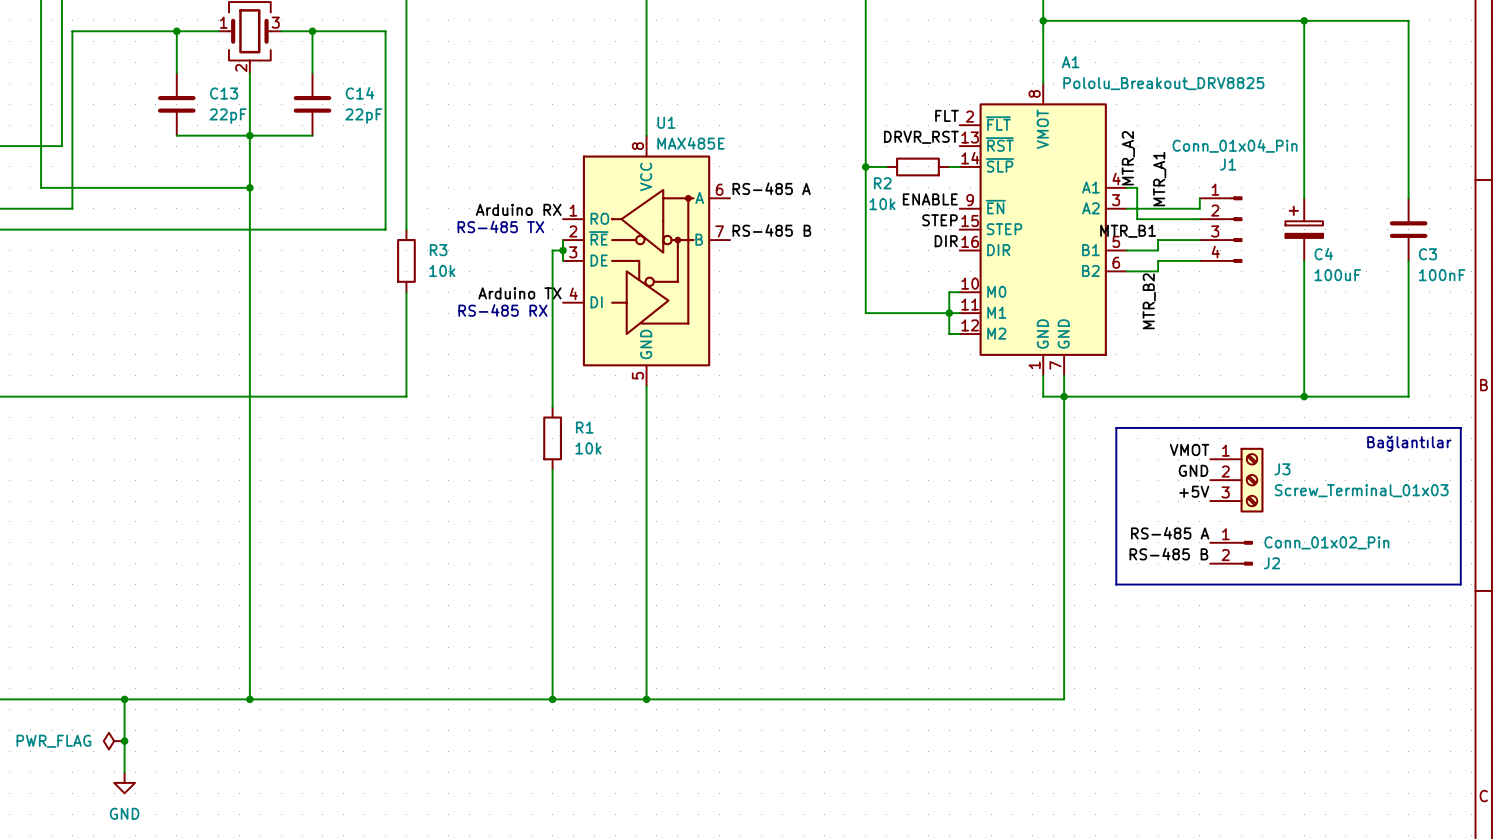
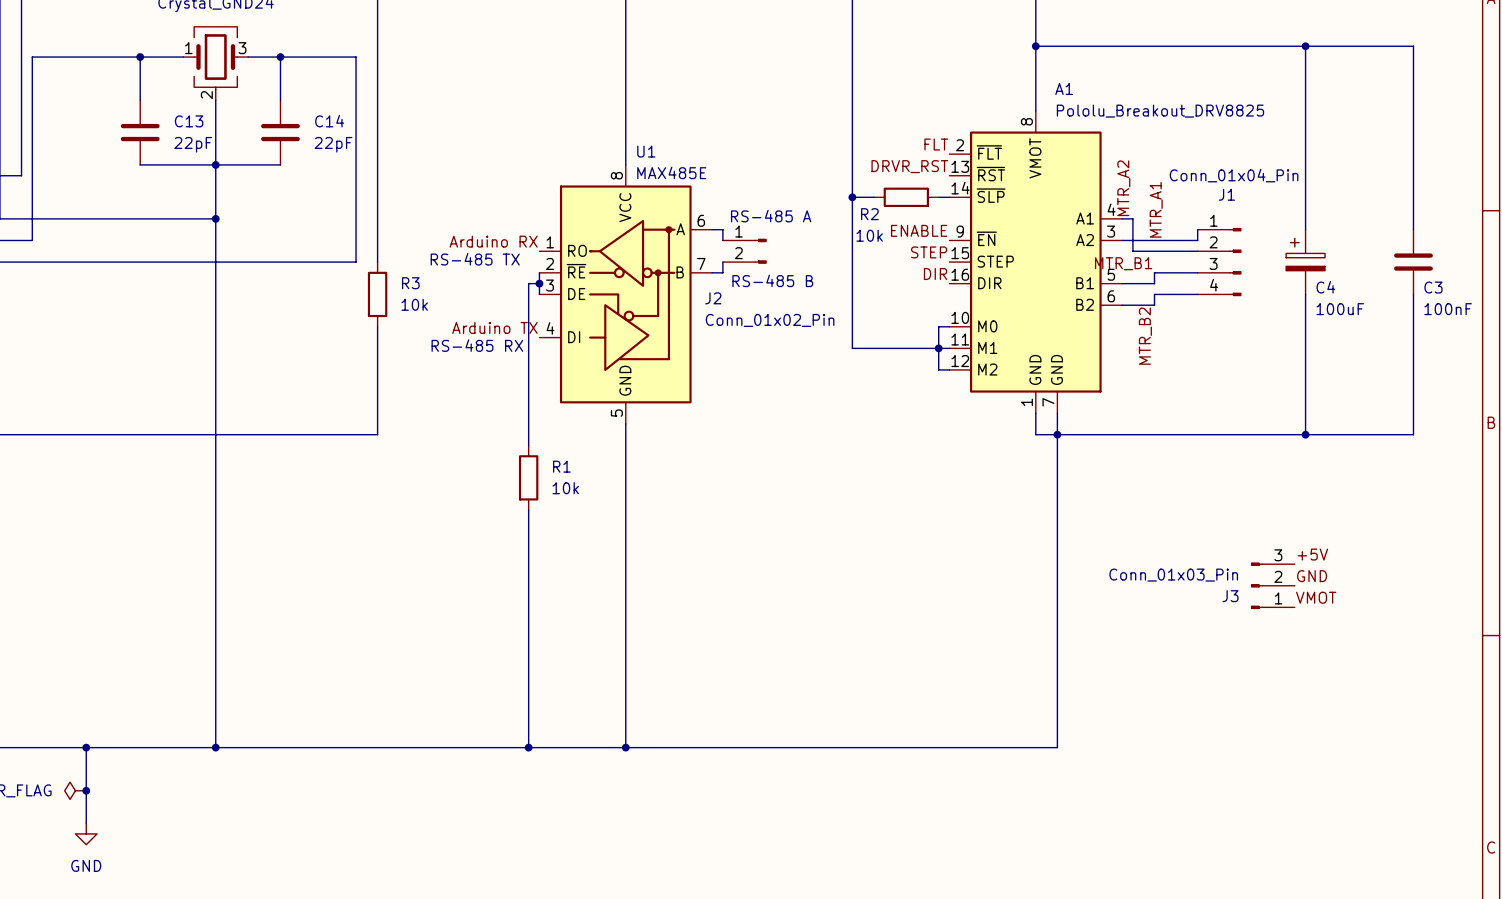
text: none -> RS-485 A (771, 216)
label: RS-485 A (771, 188) -> none
wire: none -> (712, 229) (722, 229) (722, 240)
wire: none -> (722, 262) (722, 272) (712, 272)
label: RS-485 B (771, 230) -> none
text: none -> RS-485 B (772, 280)
line: (1116, 427) (1460, 427) (1460, 584) (1116, 584) (1116, 427) -> none
text: Bağlantılar (1409, 443) -> none
J3 symbol: [1210, 447, 1264, 513] -> [1250, 562, 1295, 610]
label position: VMOT (1189, 449) -> VMOT (1316, 597)
J3 name position: J3 (1282, 469) -> J3 (1230, 596)
label position: GND (1193, 470) -> GND (1312, 576)
J3 value: Screw_Terminal_01x03 (1361, 490) -> Conn_01x03_Pin (1173, 575)
label position: +5V (1194, 491) -> +5V (1312, 554)
label: RS-485 A (1170, 533) -> none
J2 value position: Conn_01x02_Pin (1326, 542) -> Conn_01x02_Pin (770, 320)
J2 position: (1231, 553) -> (744, 251)
label: RS-485 B (1168, 554) -> none
J2 name position: J2 (1271, 563) -> J2 (713, 298)

